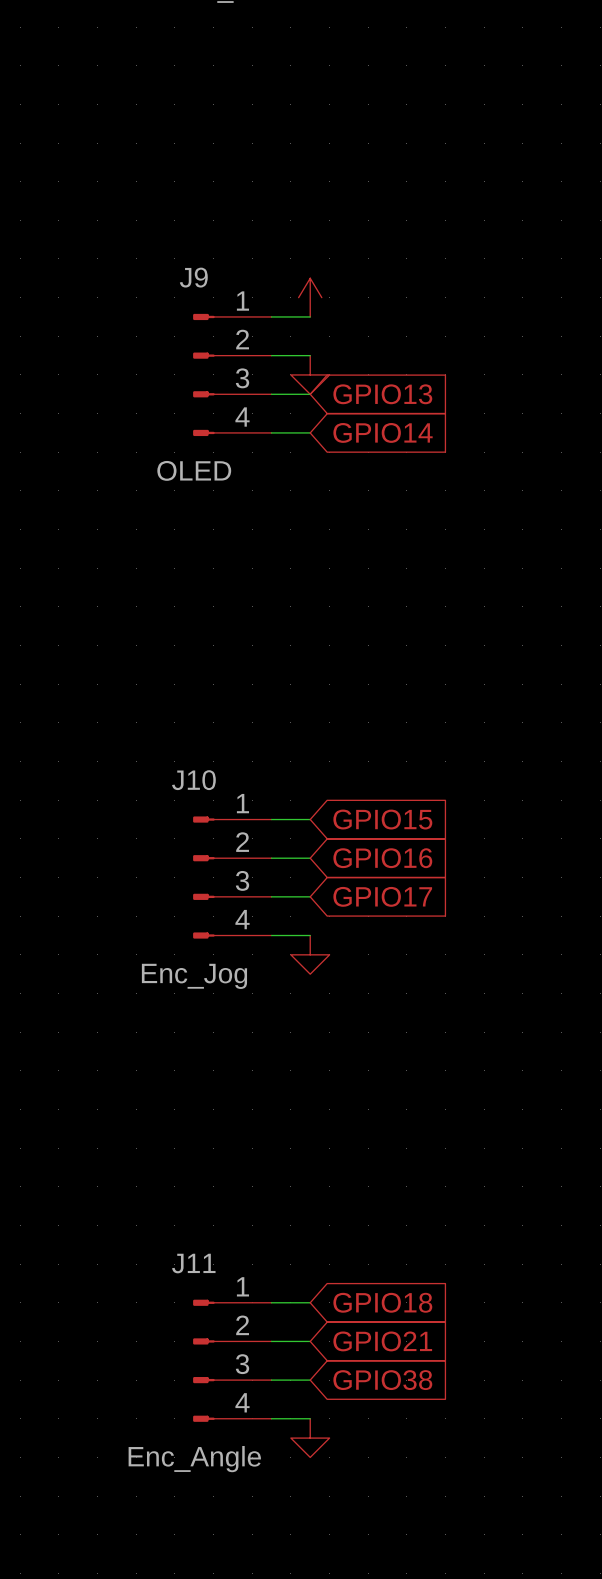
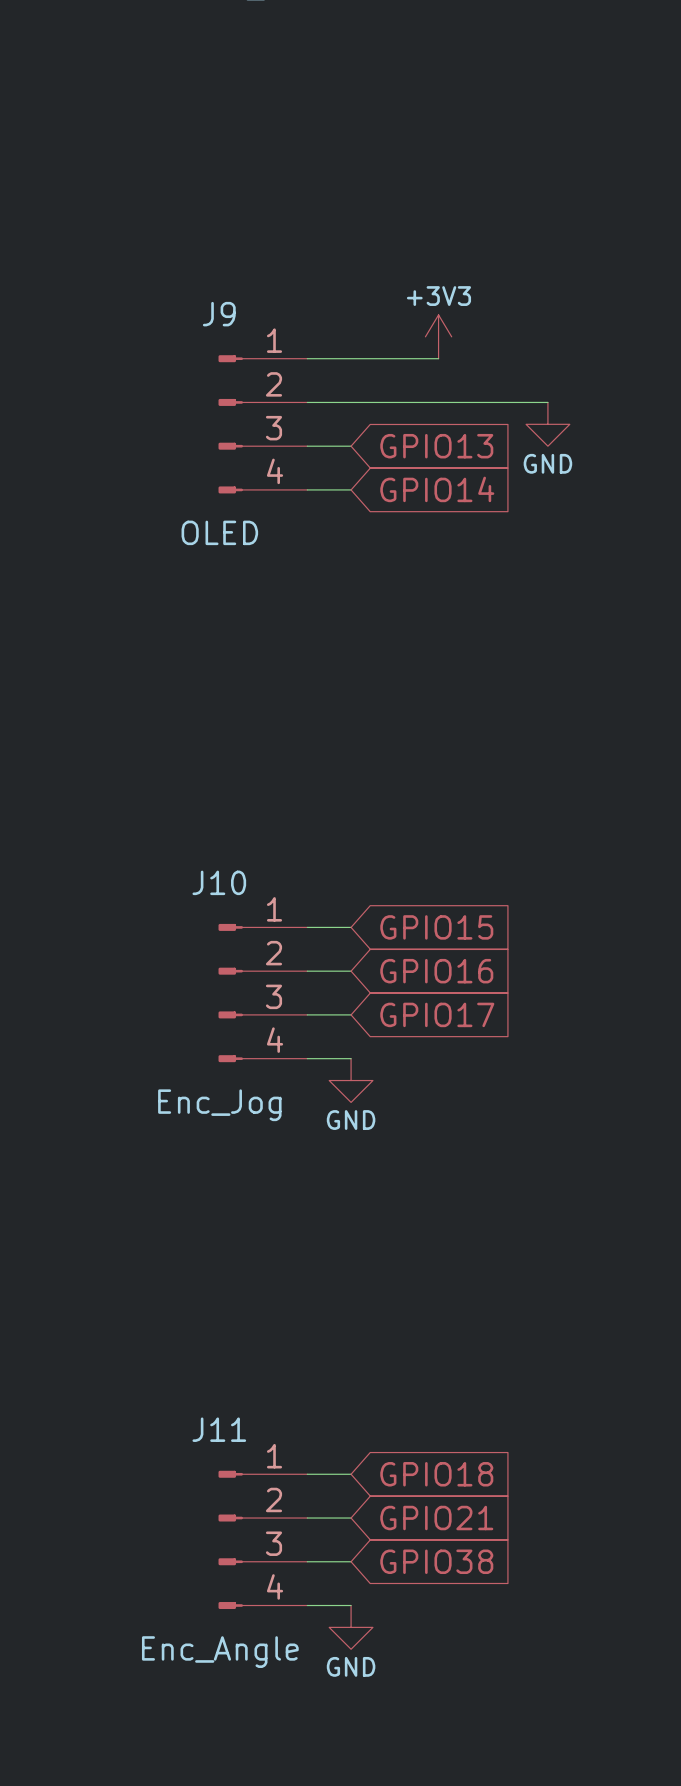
power symbol: (310, 297) -> none
power symbol: none -> +3V3 (438, 336)
wire: none -> (351, 358) (438, 358)
wire: none -> (351, 402) (547, 402)
power symbol: (310, 374) -> none
power symbol: none -> GND (547, 424)
power symbol text: none -> GND (351, 1120)
power symbol text: none -> GND (351, 1666)

